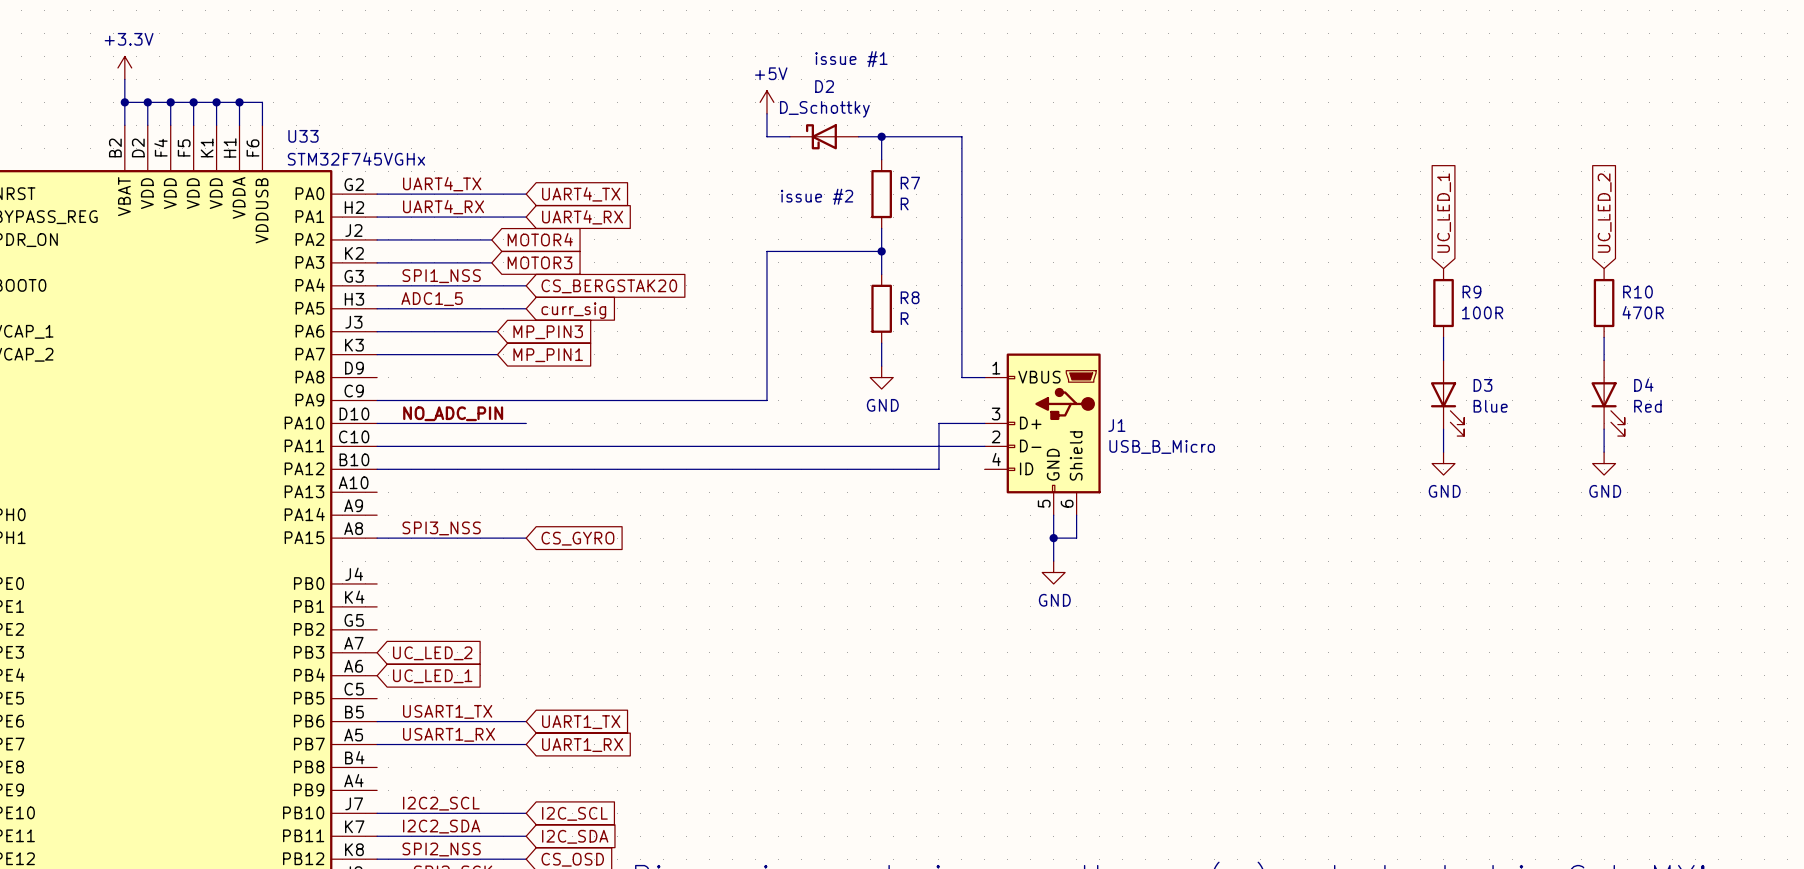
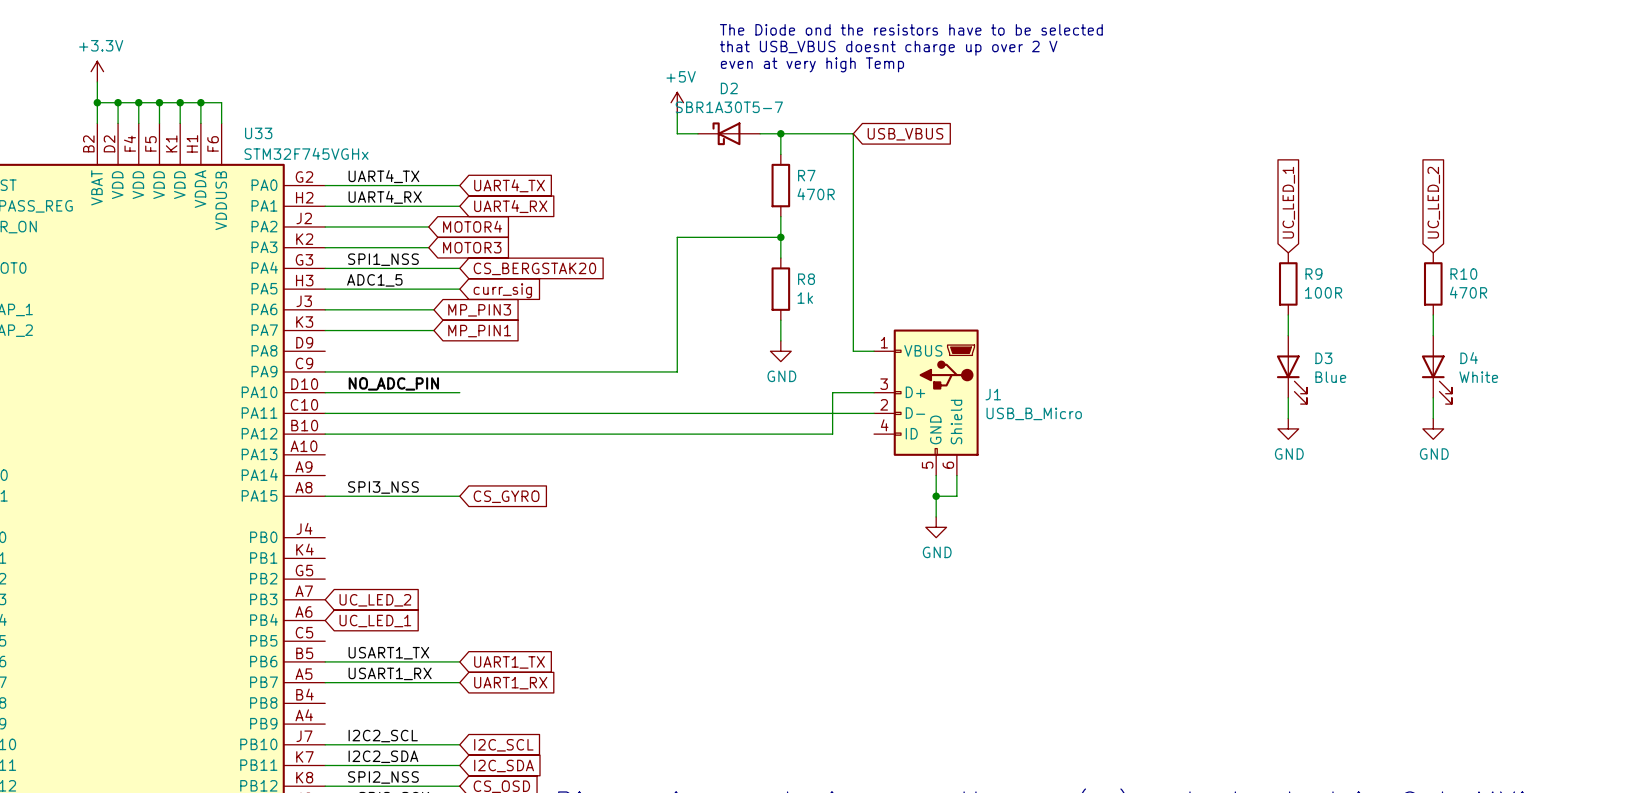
text: none -> The Diode ond the resistors have to be selected (911, 29)
text: none -> that USB_VBUS doesnt charge up over 2 V (888, 48)
text: issue #1 (851, 59) -> even at very high Temp (812, 64)
D2 value: D_Schottky (824, 109) -> SBR1A30T5-7 (729, 107)
global label: none -> USB_VBUS (905, 134)
text: issue #2 (817, 196) -> none
R7 value: R (904, 203) -> 470R (816, 194)
R8 value: R (904, 318) -> 1k (805, 298)
D4 value: Red (1647, 406) -> White (1478, 377)

